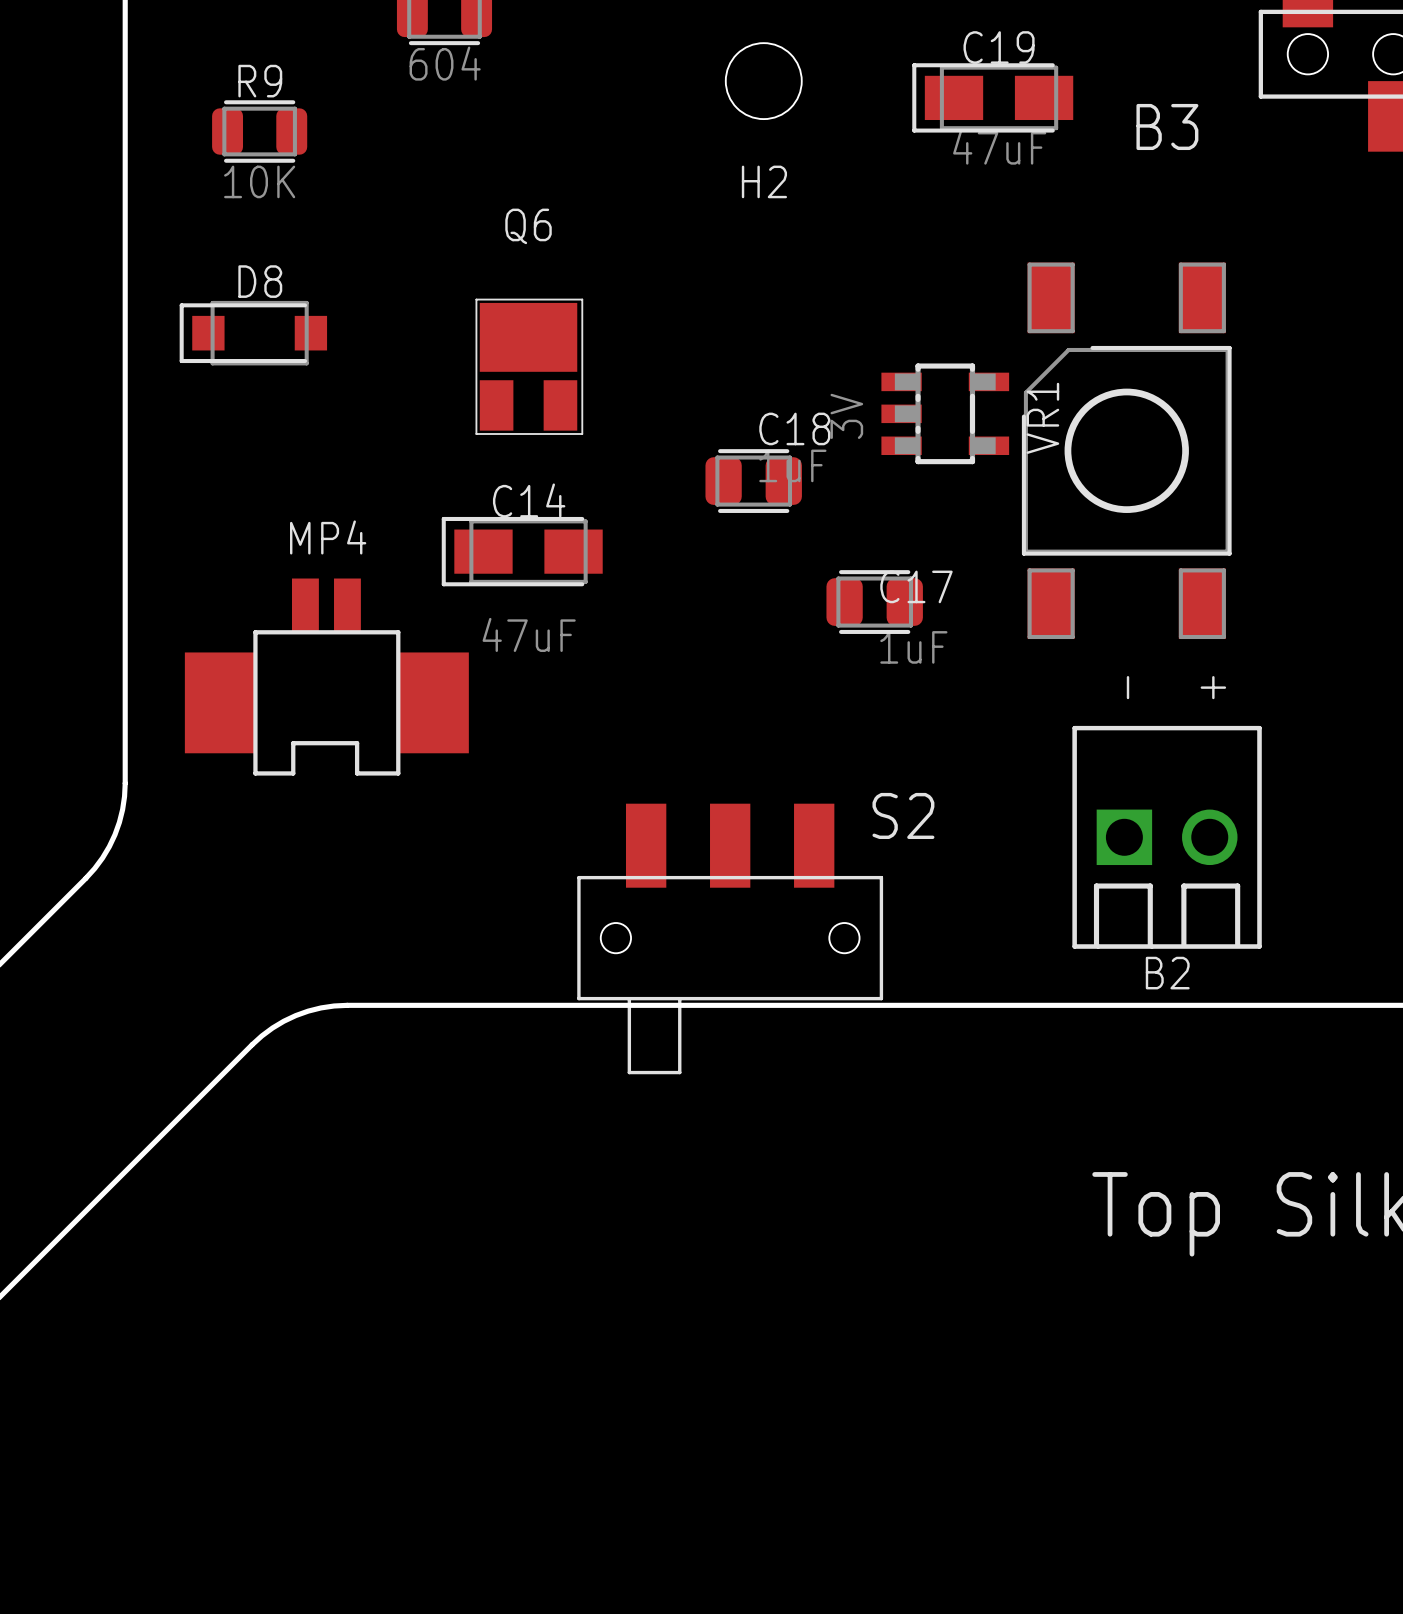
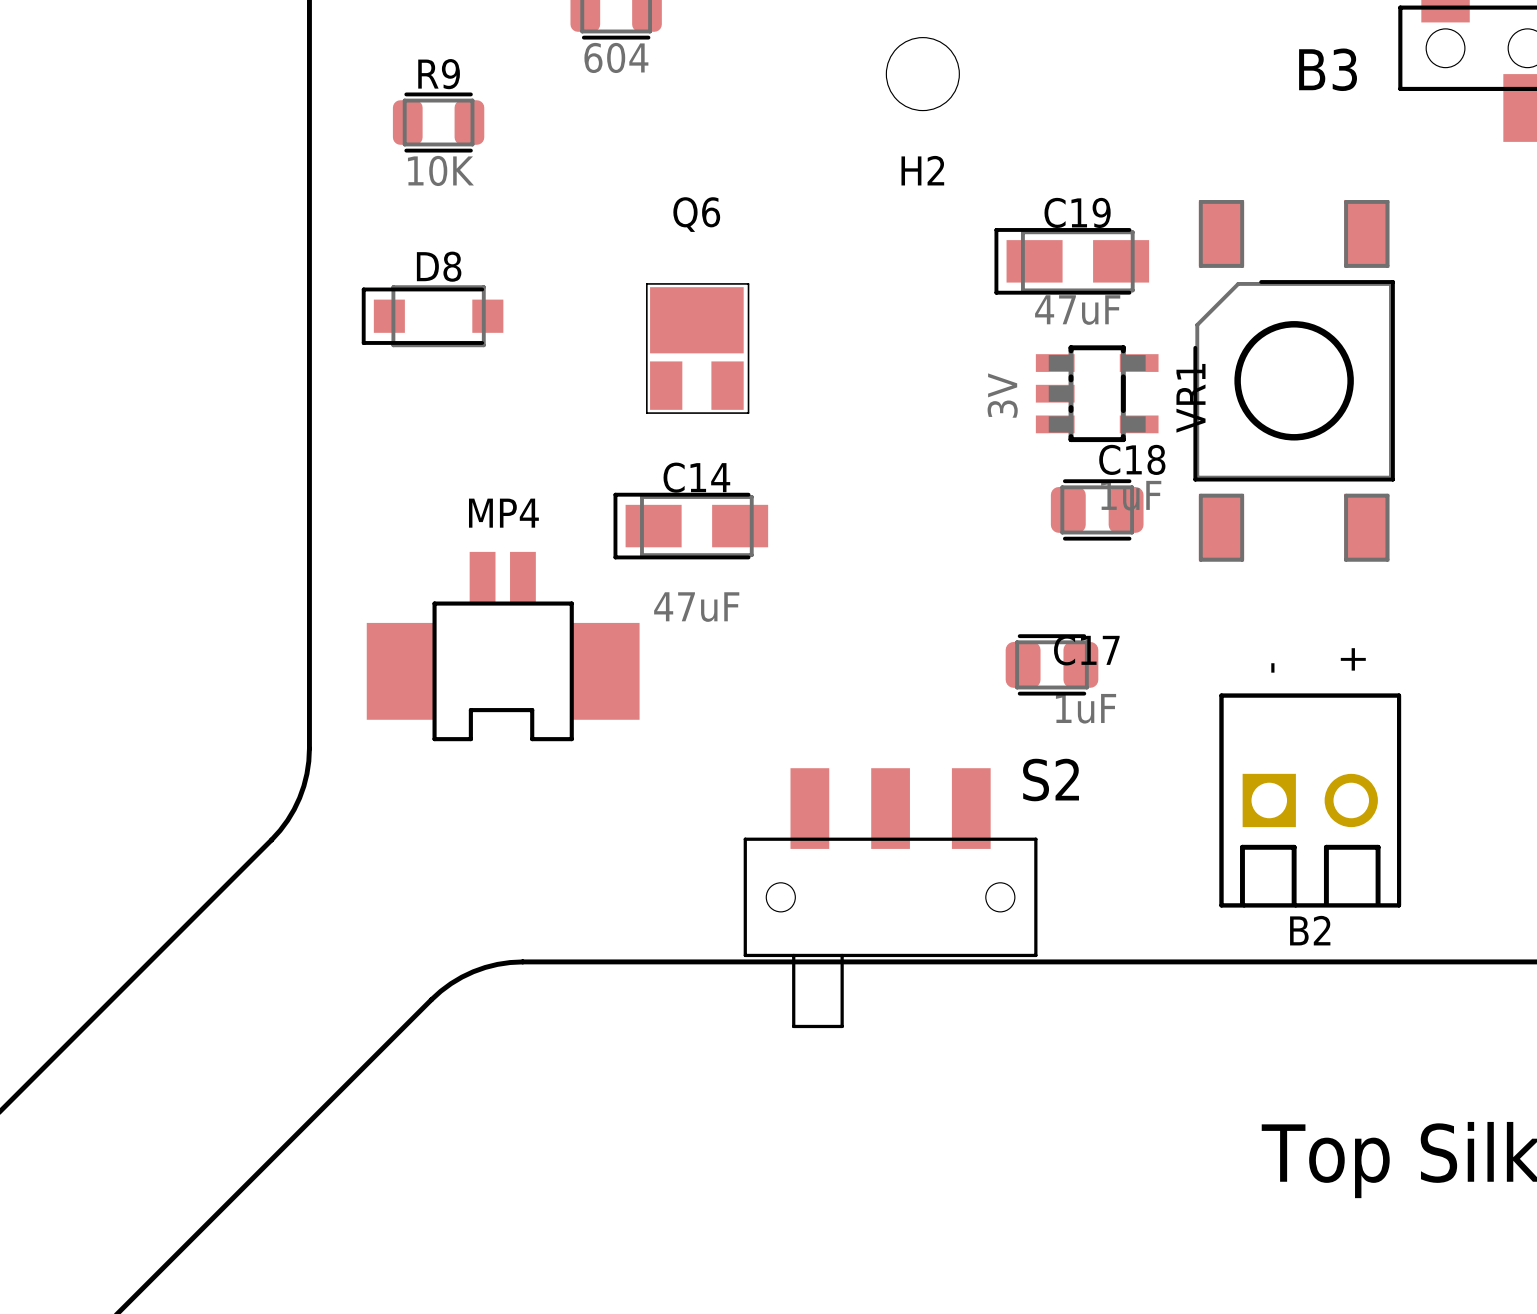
C19 position: (992, 97) -> (1071, 261)
B3 position: (1126, 450) -> (1294, 380)
C18 position: (753, 481) -> (1097, 509)
C17 position: (874, 602) -> (1051, 664)

